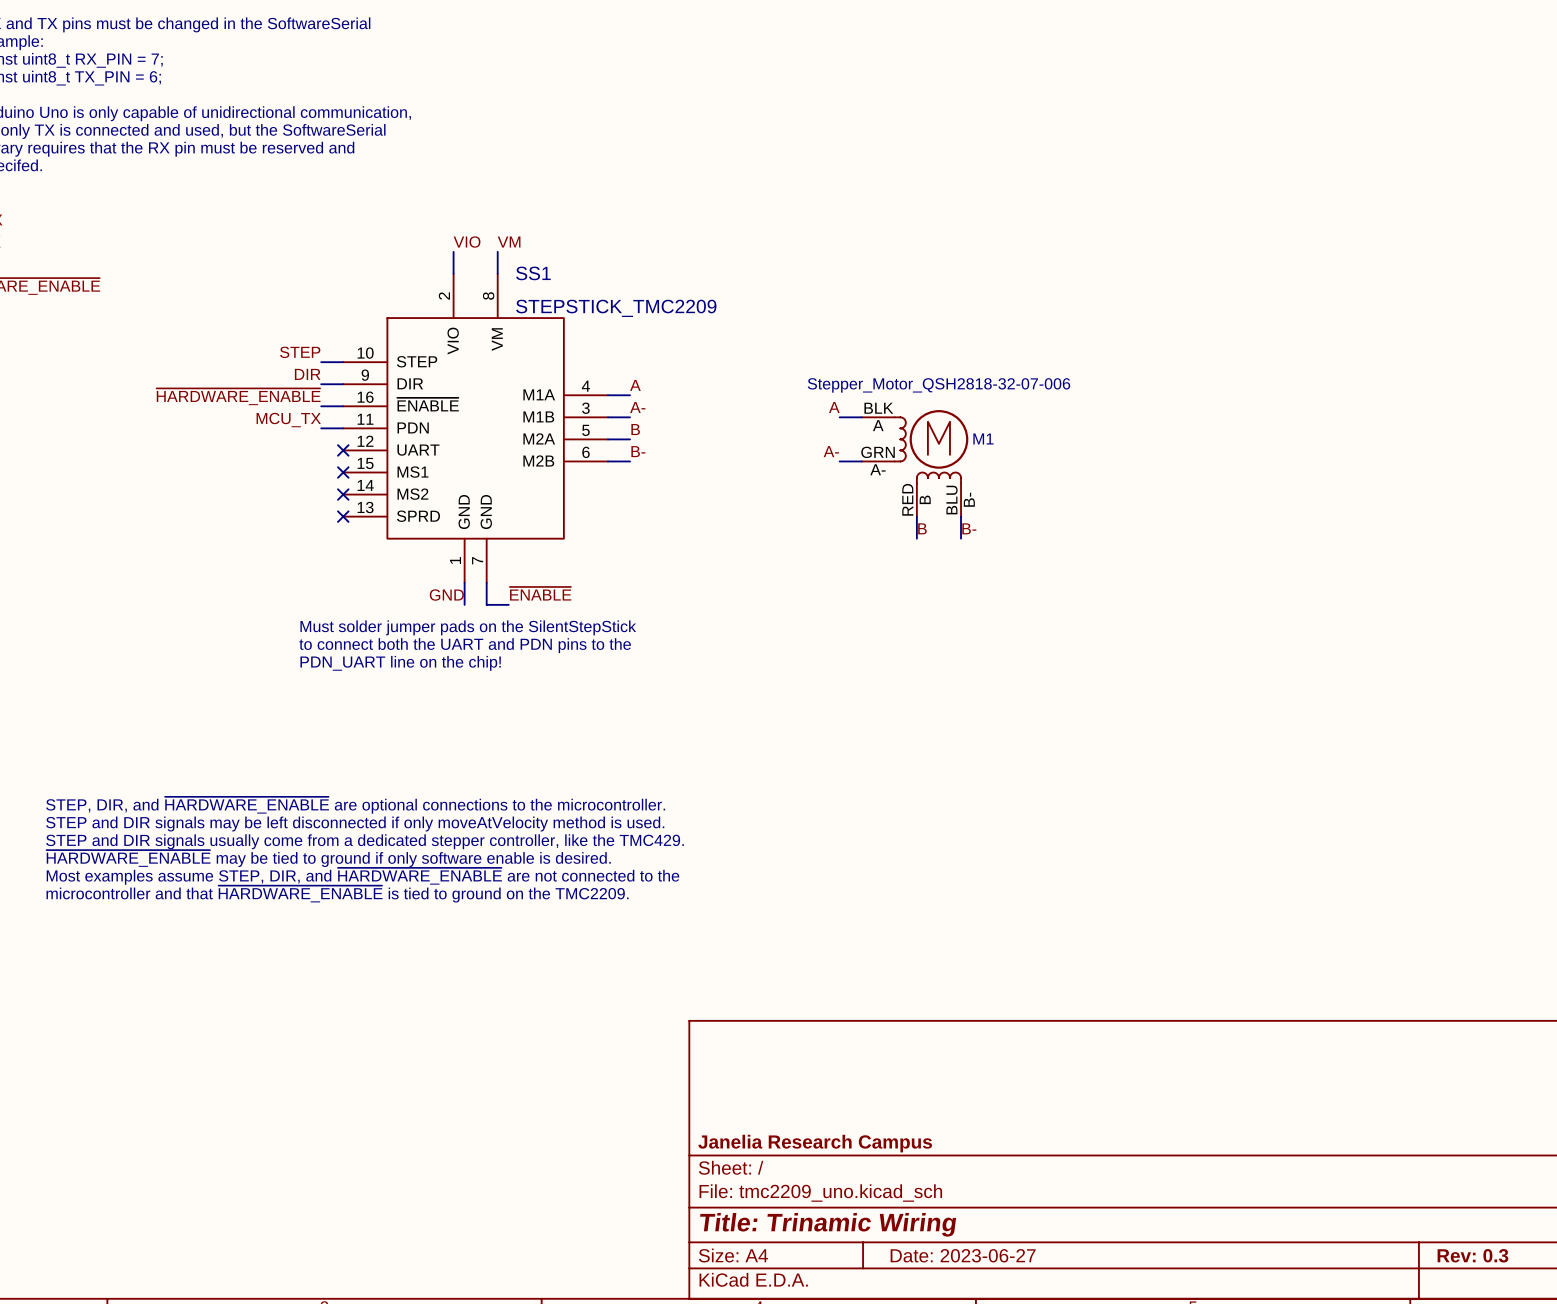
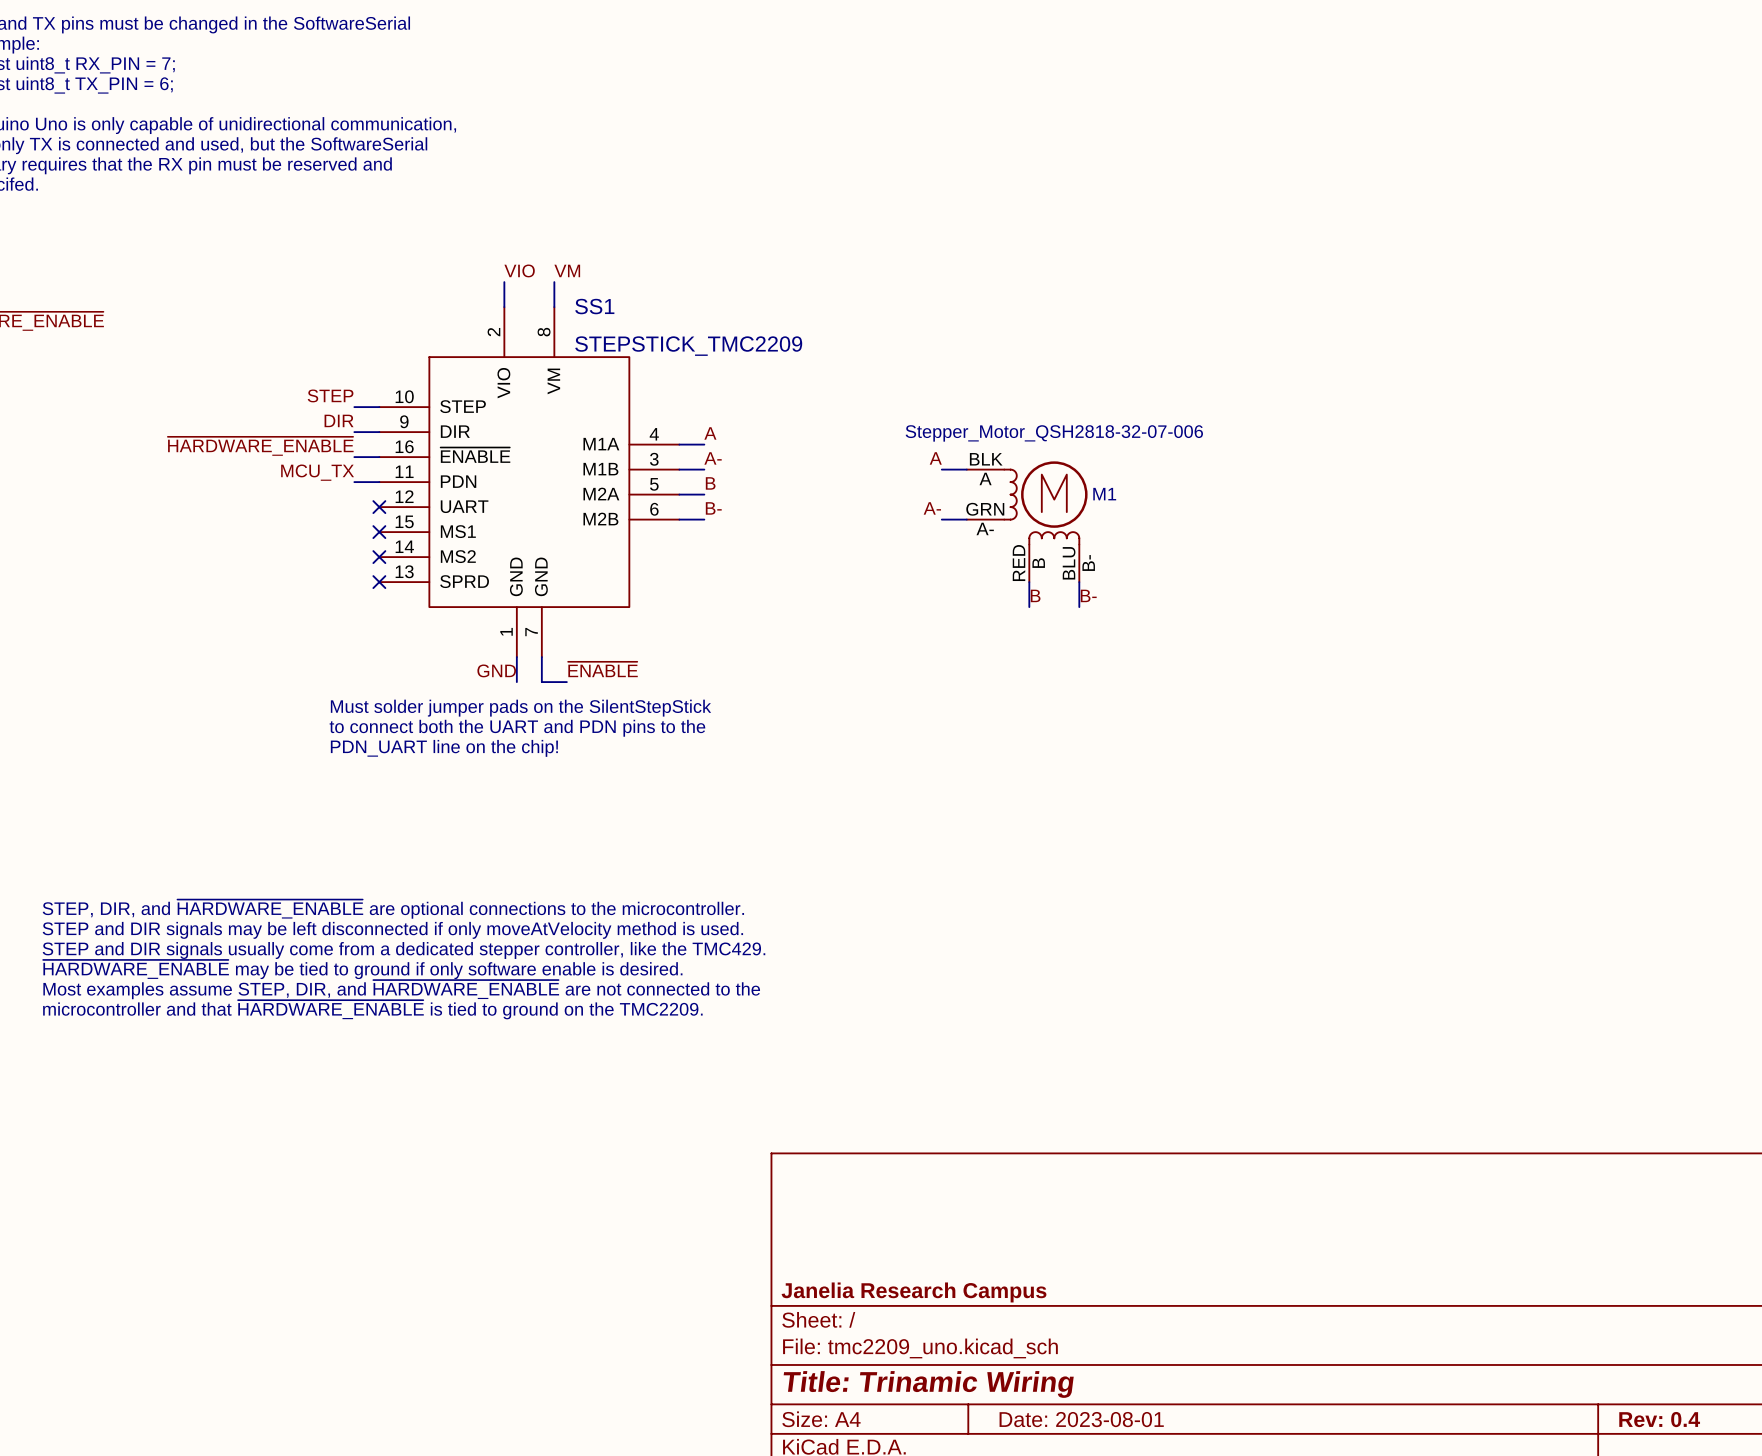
title block: Date: 2023-06-27 (963, 1255) -> Date: 2023-08-01 (1081, 1419)
title block: Rev: 0.3 (1472, 1255) -> Rev: 0.4 (1659, 1419)

